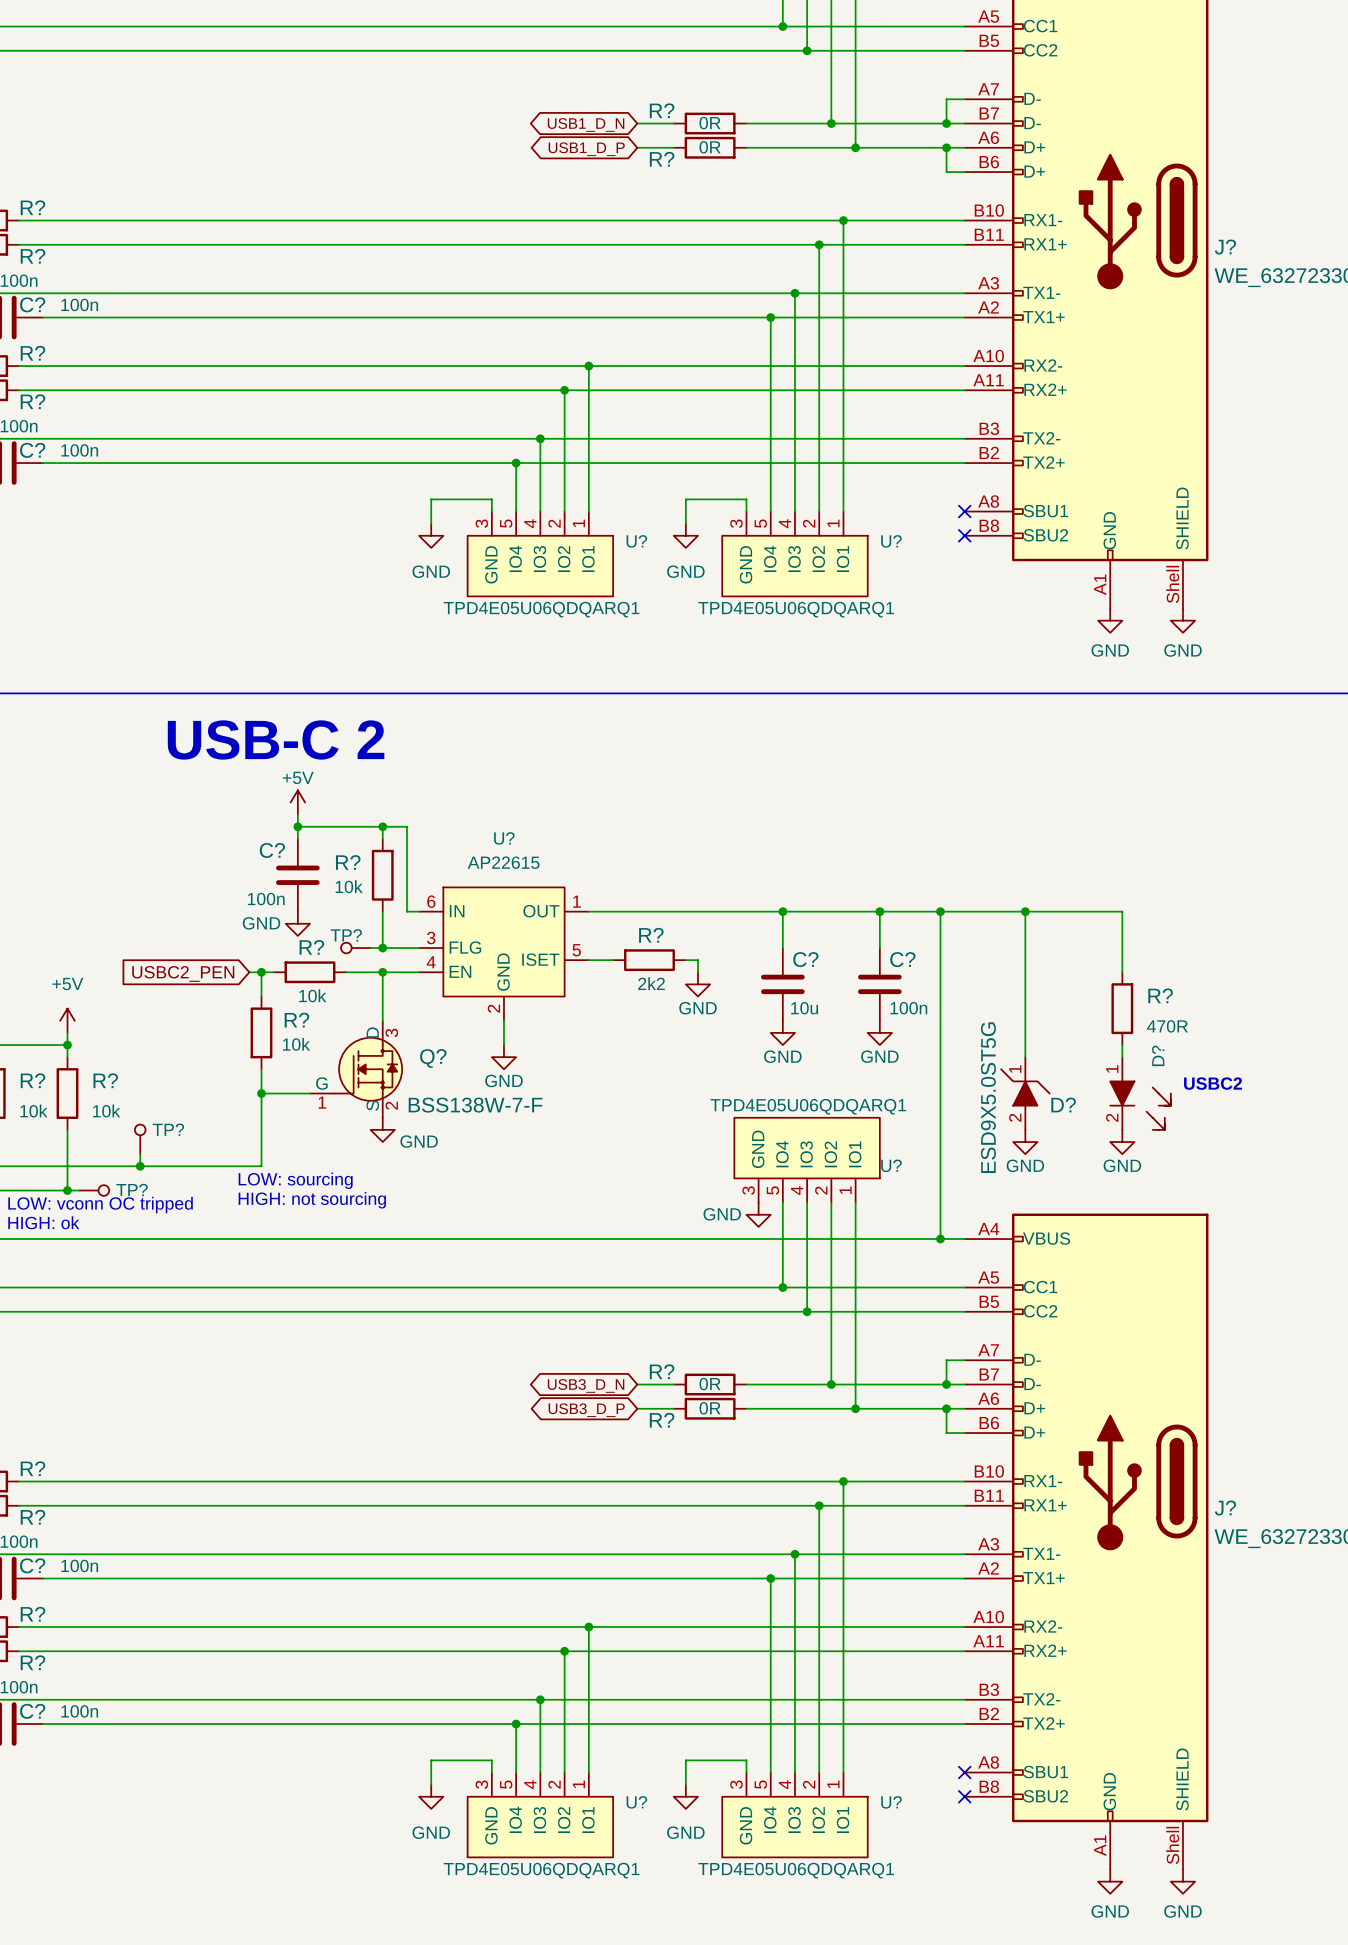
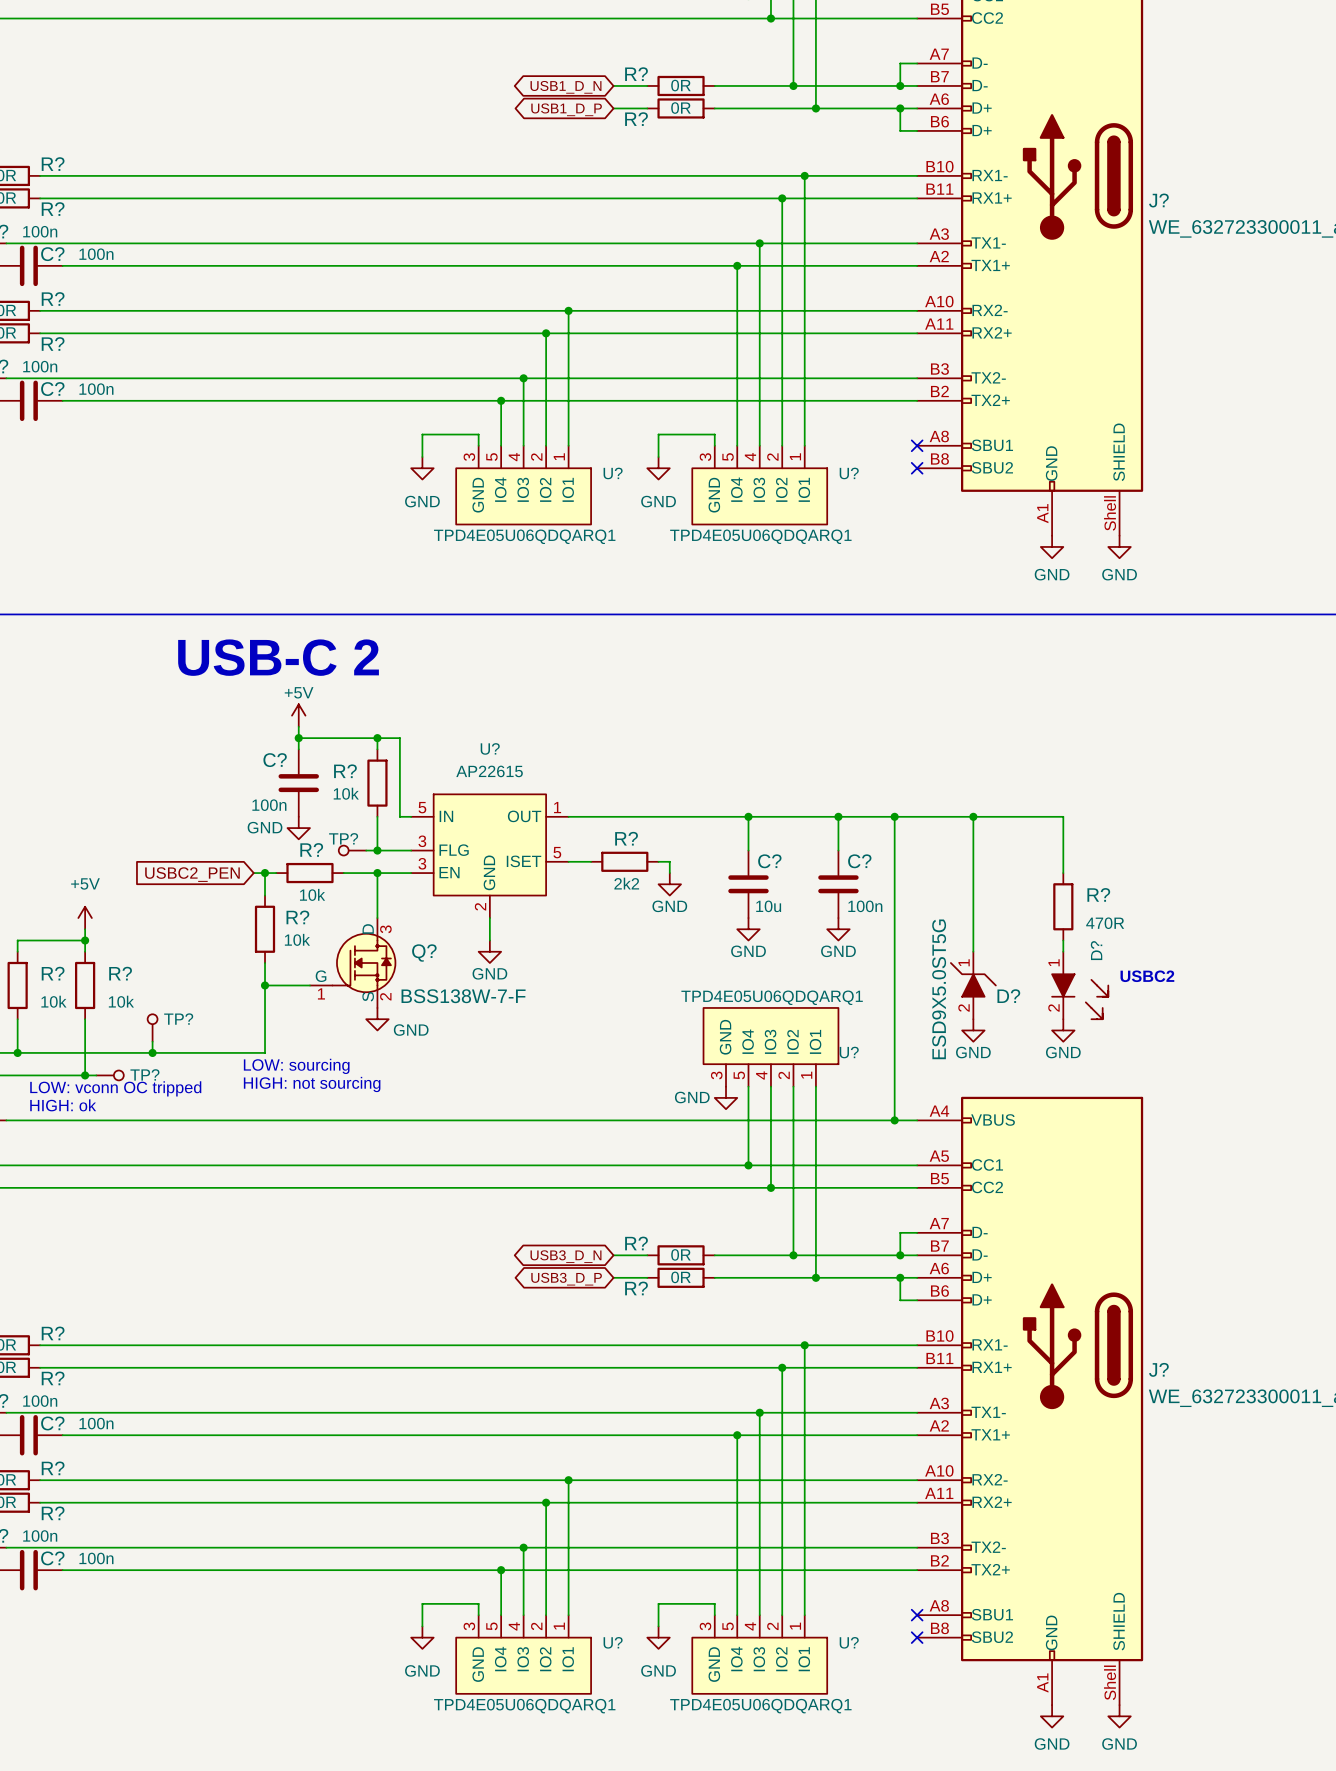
U? pin number: 6 (431, 901) -> 5 (422, 807)
U? pin number: 4 (431, 962) -> 3 (422, 863)

